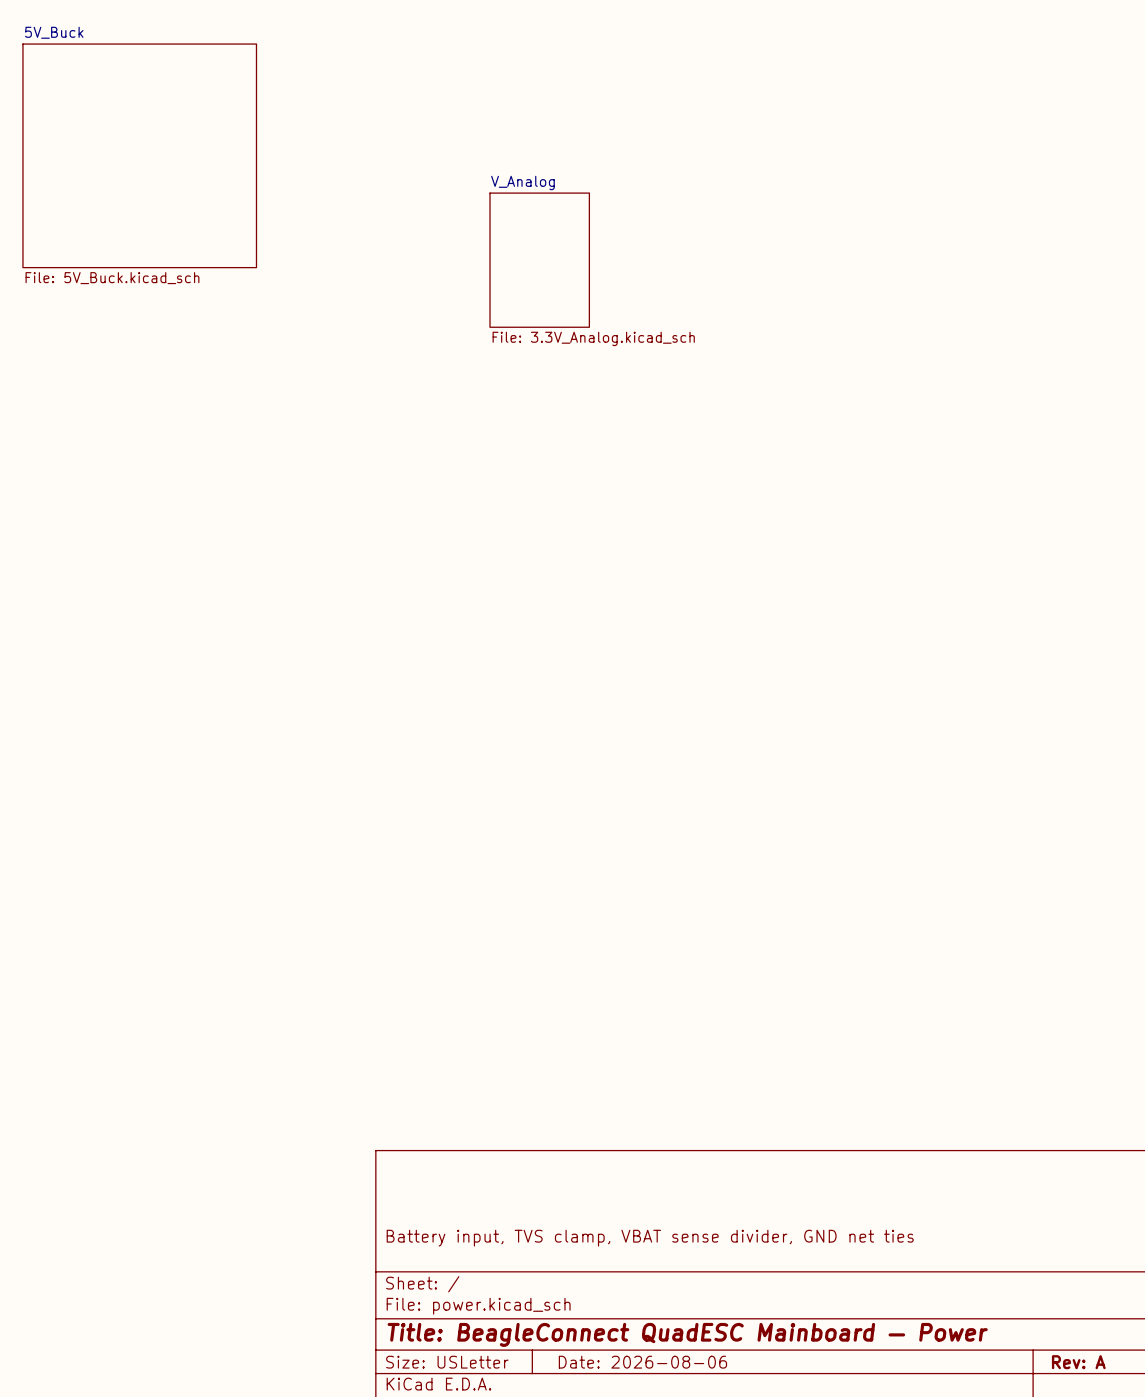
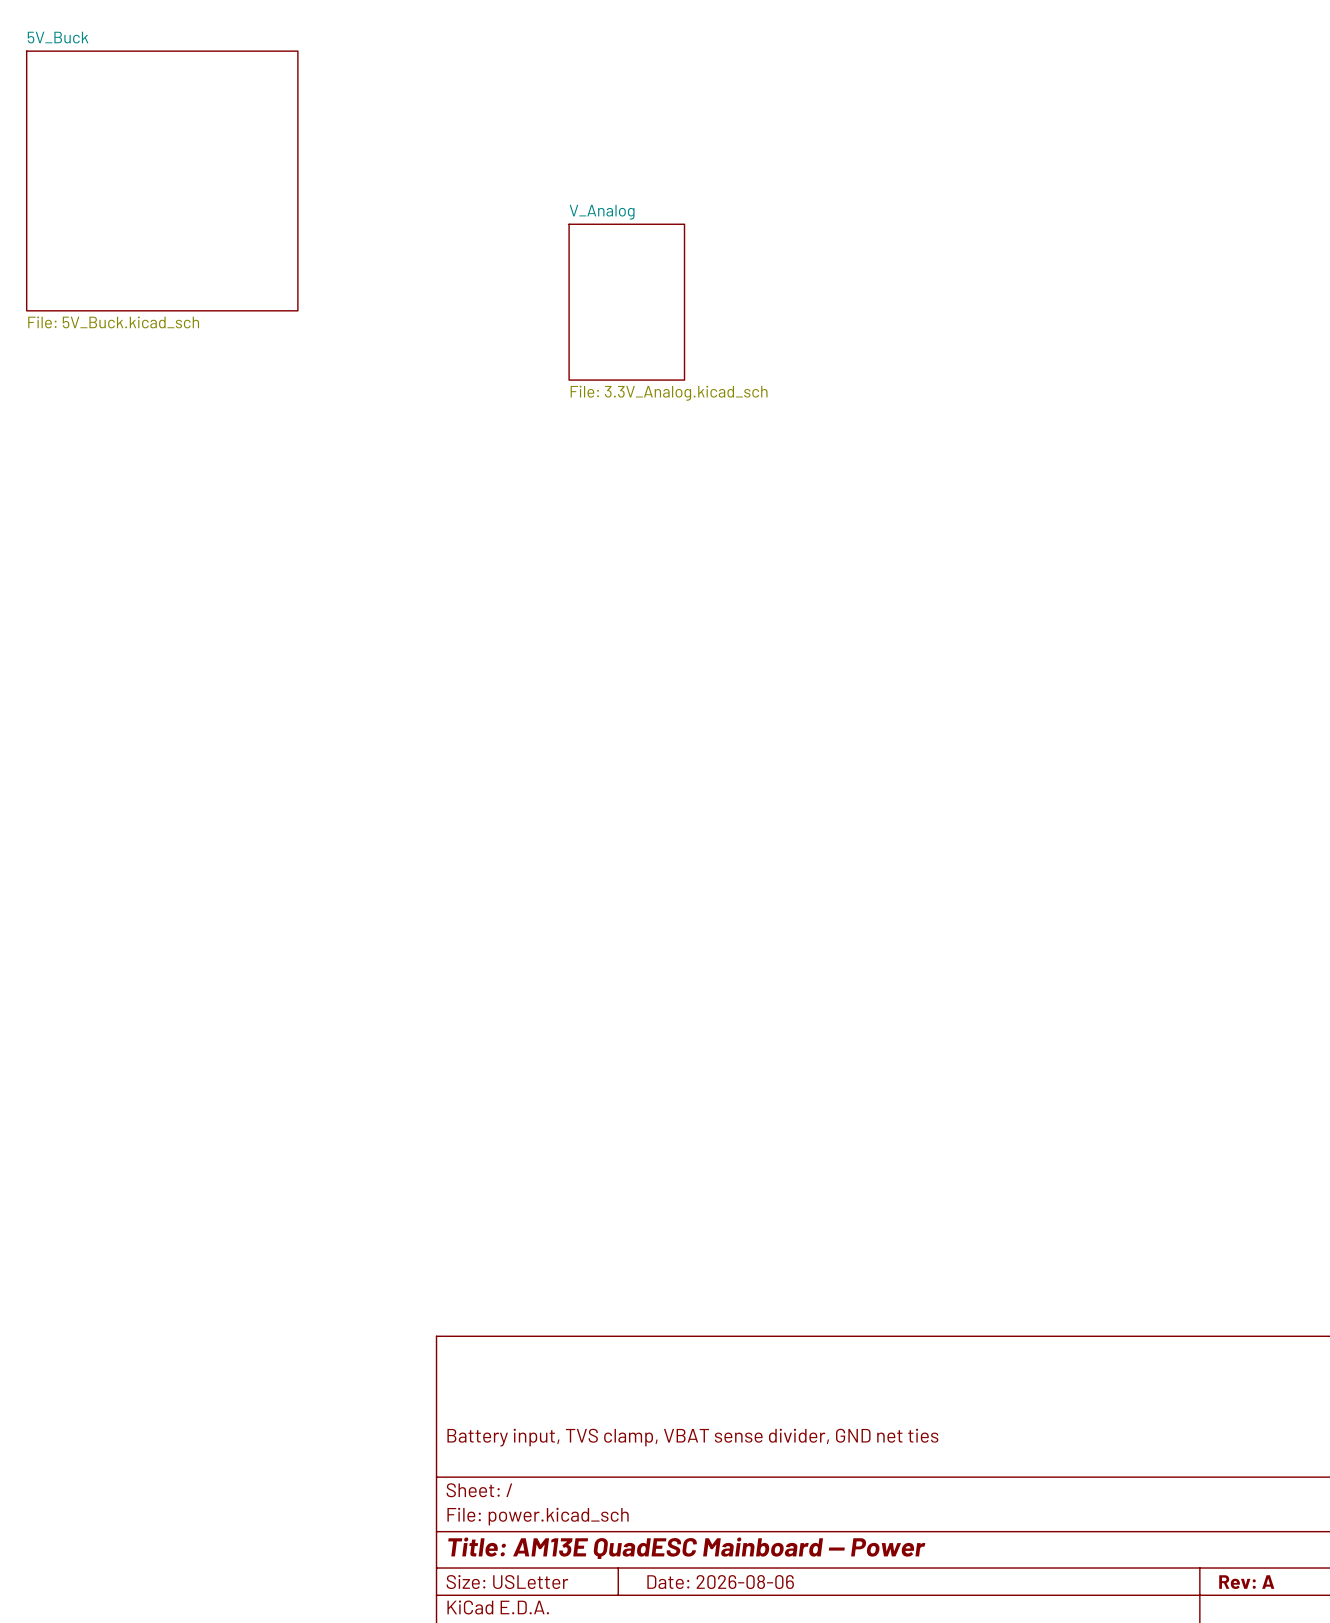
title block: Title: BeagleConnect QuadESC Mainboard — Power (687, 1334) -> Title: AM13E QuadESC Mainboard — Power (686, 1548)

